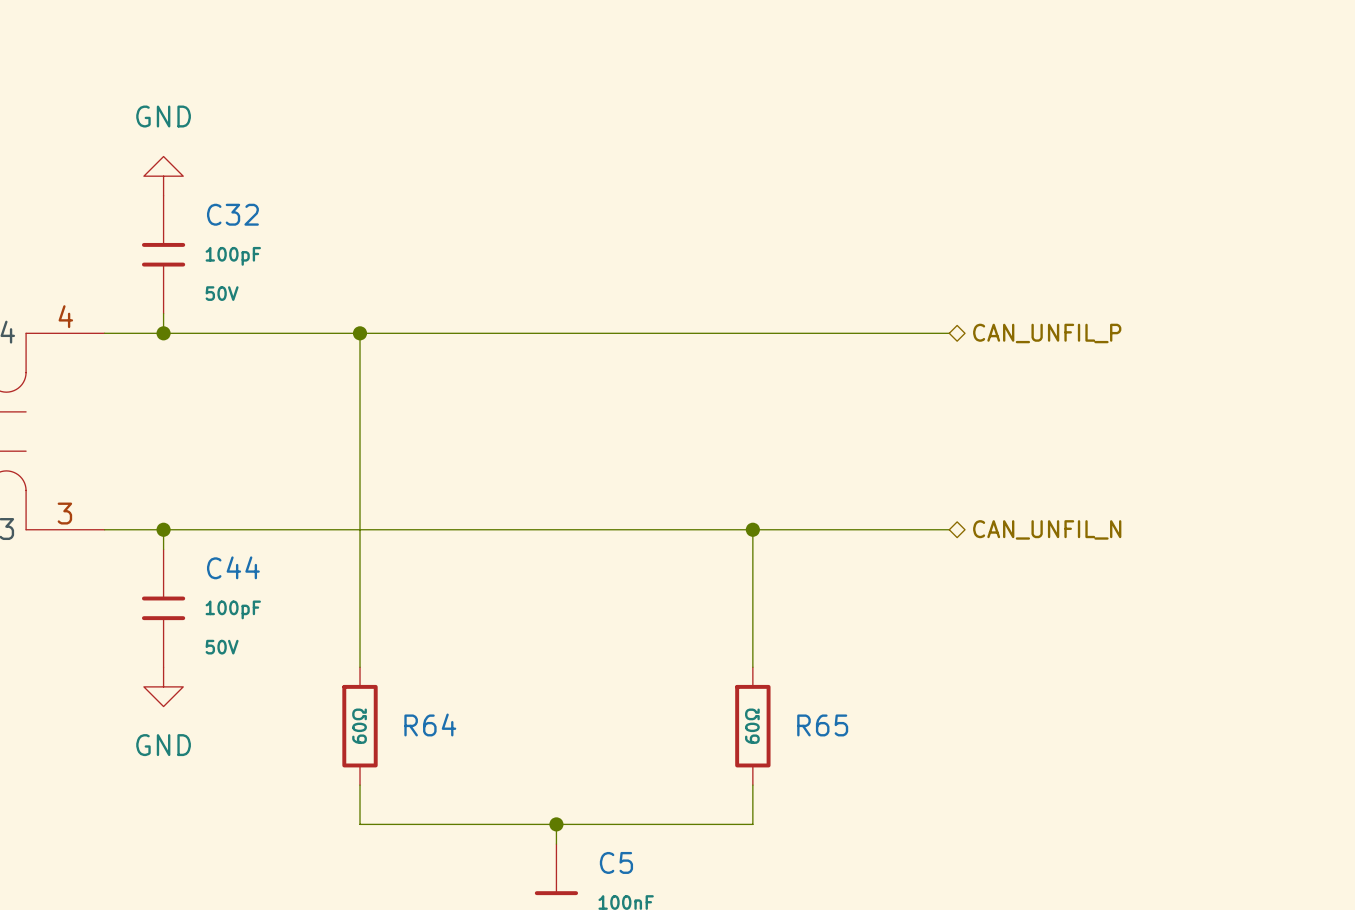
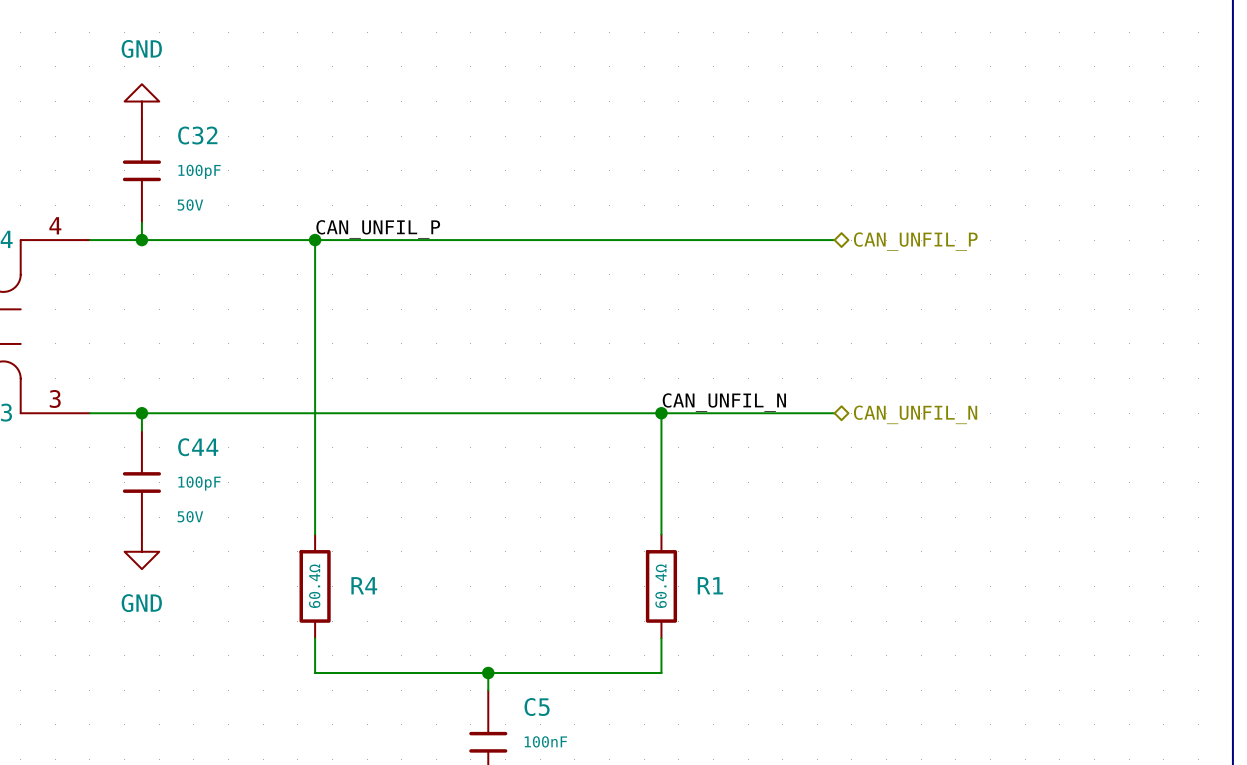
label: none -> CAN_UNFIL_P (378, 229)
label: none -> CAN_UNFIL_N (724, 402)
R64 name: R64 (430, 724) -> R4 (364, 585)
R65 name: R65 (822, 725) -> R1 (710, 585)
R64 value: 60Ω (359, 726) -> 60.4Ω (314, 586)
R65 value: 60Ω (752, 726) -> 60.4Ω (661, 586)

